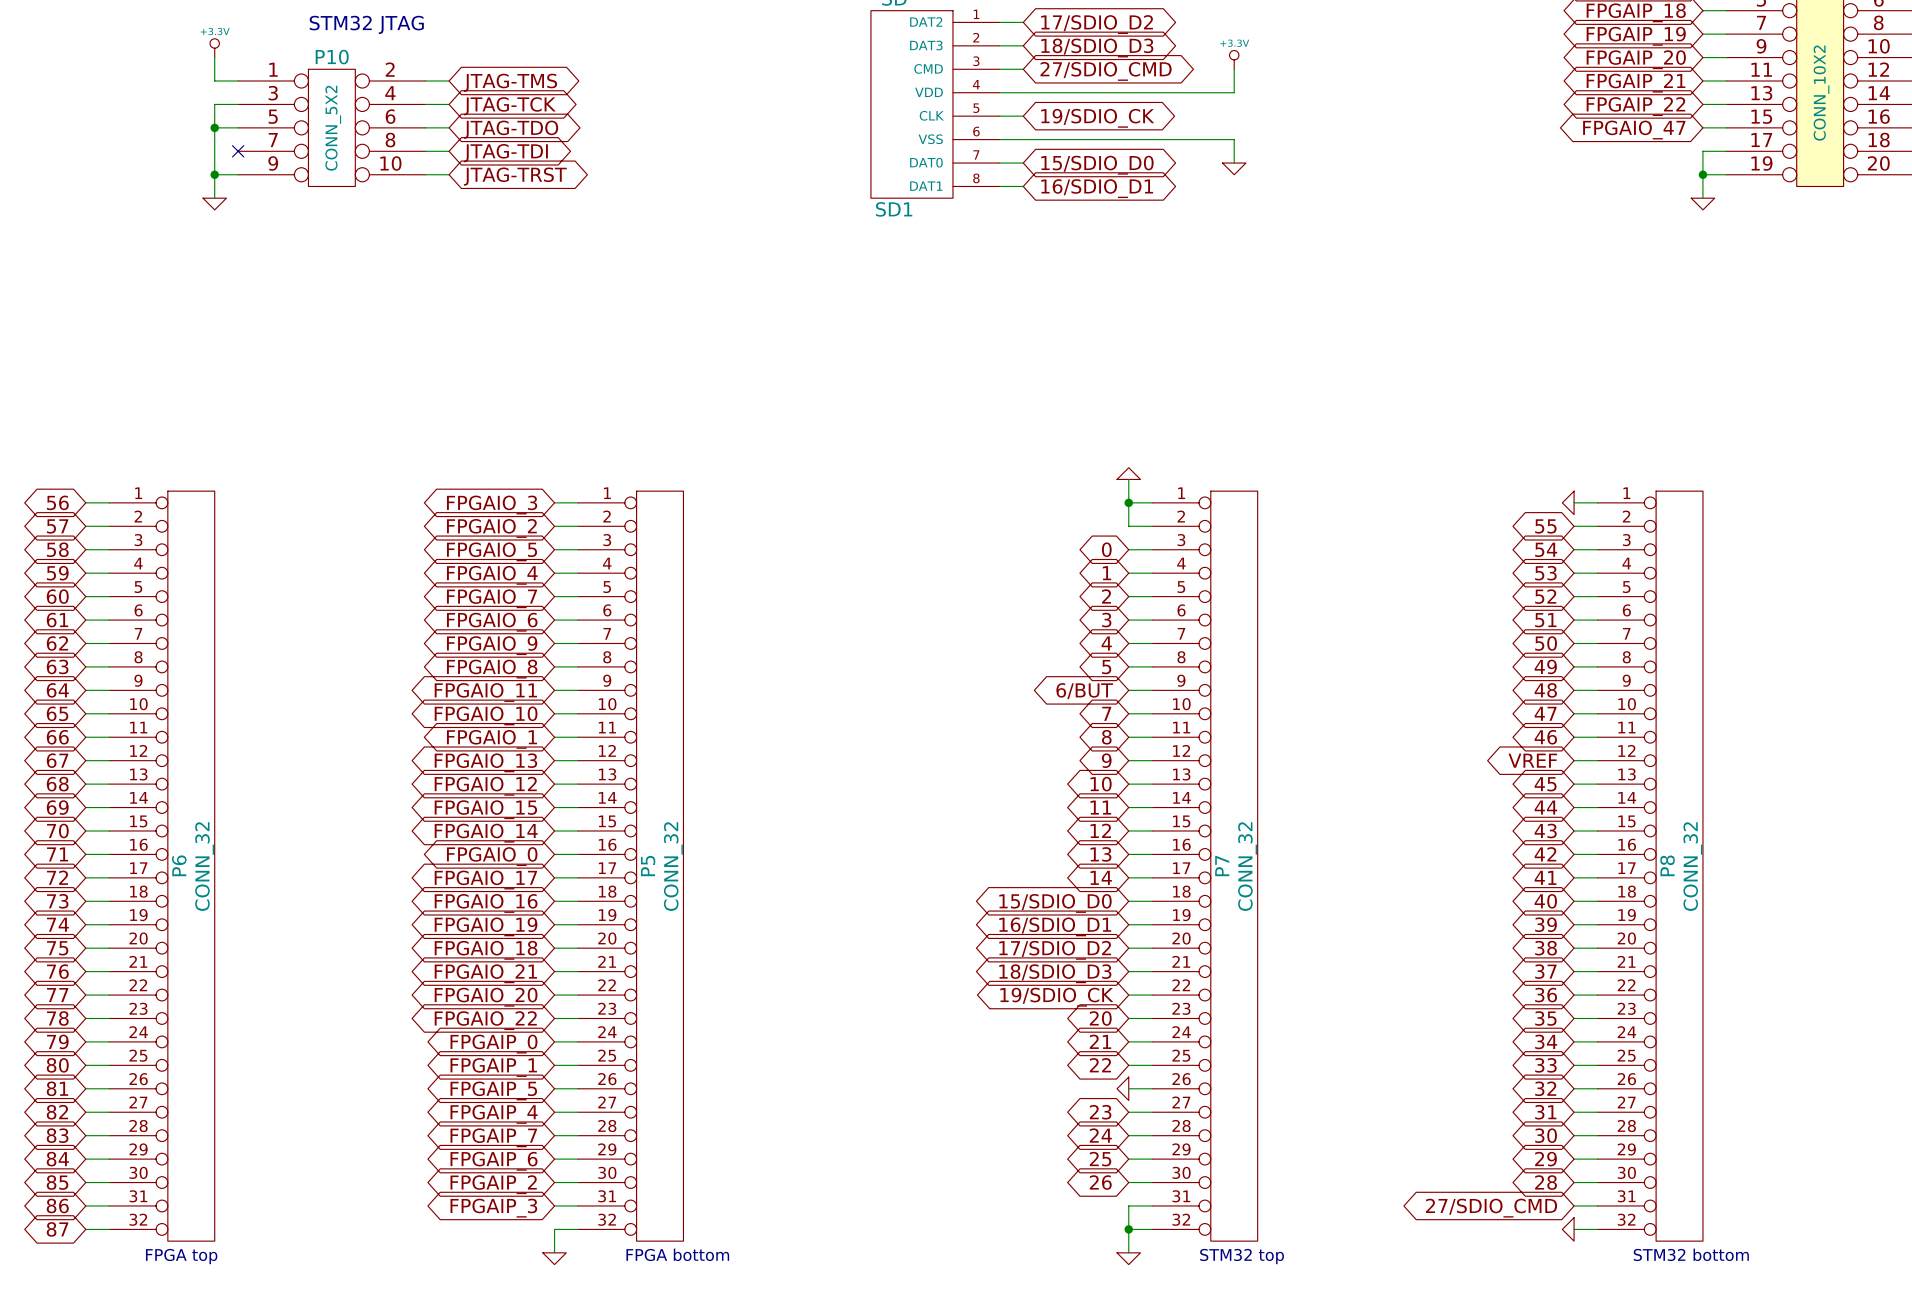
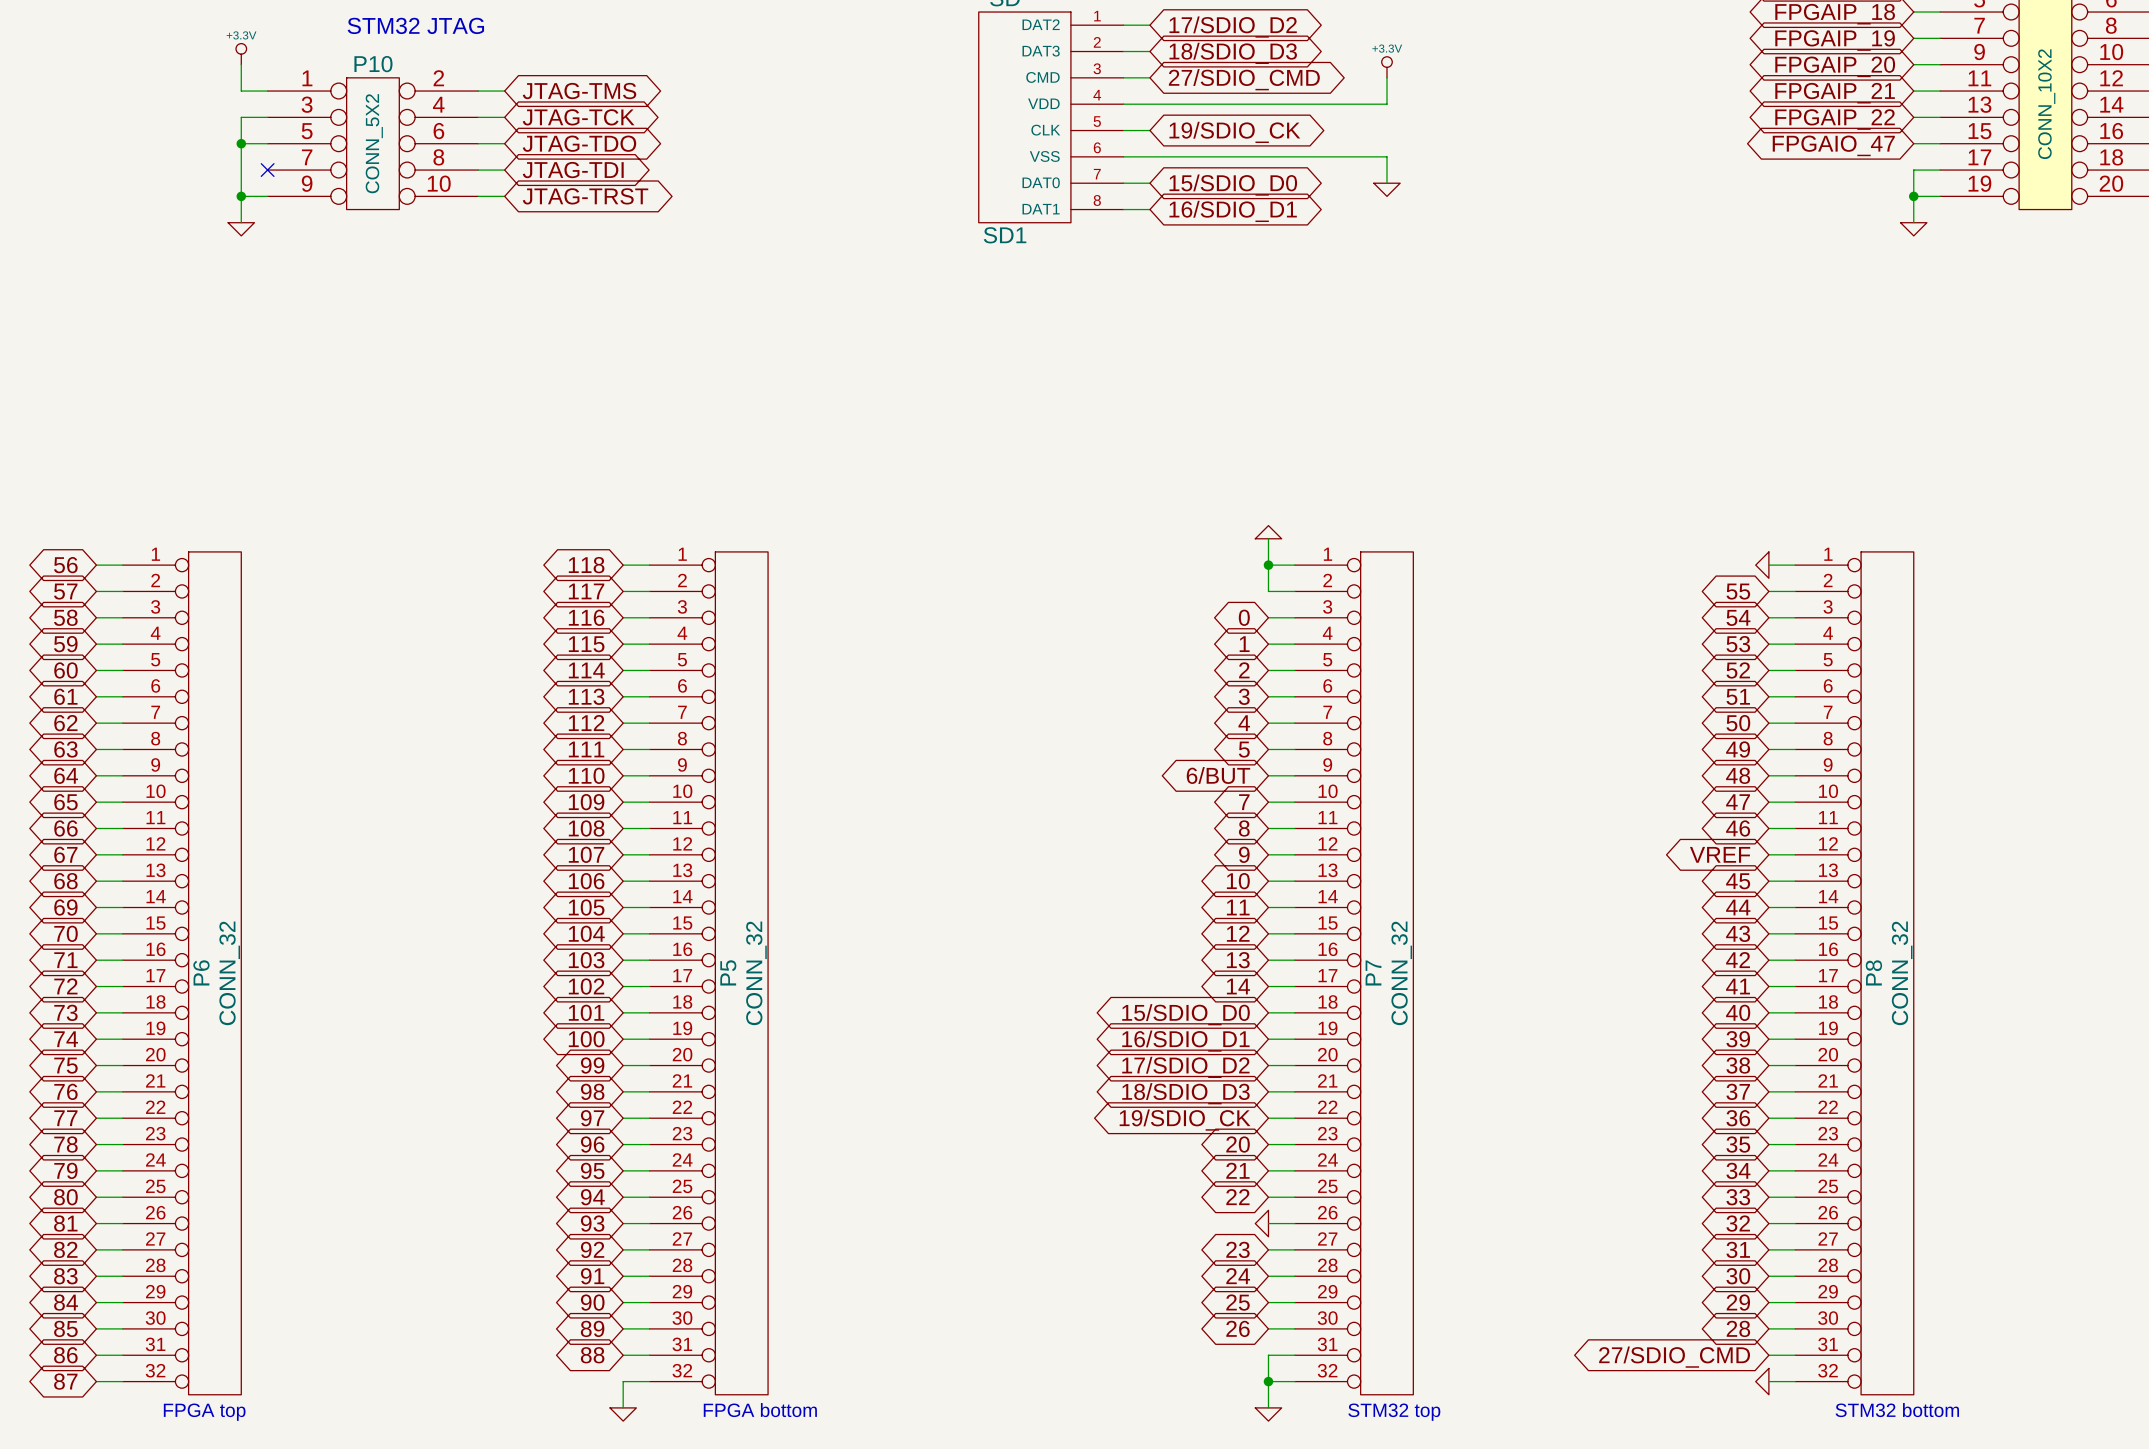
global label: FPGAIO_3 (492, 505) -> 118 (586, 565)
global label: FPGAIO_2 (491, 528) -> 117 (586, 591)
global label: FPGAIO_5 (492, 551) -> 116 (586, 617)
global label: FPGAIO_4 (492, 575) -> 115 (586, 644)
global label: FPGAIO_7 (492, 598) -> 114 (586, 670)
global label: FPGAIO_6 (492, 622) -> 113 (586, 696)
global label: FPGAIO_9 (492, 645) -> 112 (586, 723)
global label: FPGAIO_8 (492, 669) -> 111 (586, 749)
global label: FPGAIO_11 (485, 692) -> 110 (586, 775)
global label: FPGAIO_10 (486, 715) -> 109 (586, 802)
global label: FPGAIO_1 (491, 739) -> 108 (586, 828)
global label: FPGAIO_13 (485, 762) -> 107 (586, 854)
global label: FPGAIO_12 (485, 786) -> 106 (586, 881)
global label: FPGAIO_15 (485, 809) -> 105 (586, 907)
global label: FPGAIO_14 (486, 833) -> 104 (586, 933)
global label: FPGAIO_0 (492, 856) -> 103 (586, 960)
global label: FPGAIO_17 (485, 880) -> 102 (586, 986)
global label: FPGAIO_16 (486, 903) -> 101 (586, 1012)
global label: FPGAIO_19 (486, 926) -> 100 (586, 1039)
global label: FPGAIO_18 (486, 950) -> 99 (592, 1065)
global label: FPGAIO_21 (485, 973) -> 98 (592, 1091)
global label: FPGAIO_20 (486, 997) -> 97 (592, 1118)
global label: FPGAIO_22 (485, 1020) -> 96 (592, 1144)
global label: FPGAIP_0 (493, 1044) -> 95 (592, 1170)
global label: FPGAIP_1 (493, 1067) -> 94 (592, 1197)
global label: FPGAIP_5 (493, 1090) -> 93 (592, 1223)
global label: FPGAIP_4 (494, 1114) -> 92 (592, 1249)
global label: FPGAIP_7 (493, 1137) -> 91 (592, 1276)
global label: FPGAIP_6 (494, 1161) -> 90 (592, 1302)
global label: FPGAIP_2 (493, 1184) -> 89 (592, 1328)
global label: FPGAIP_3 (493, 1208) -> 88 (592, 1355)

